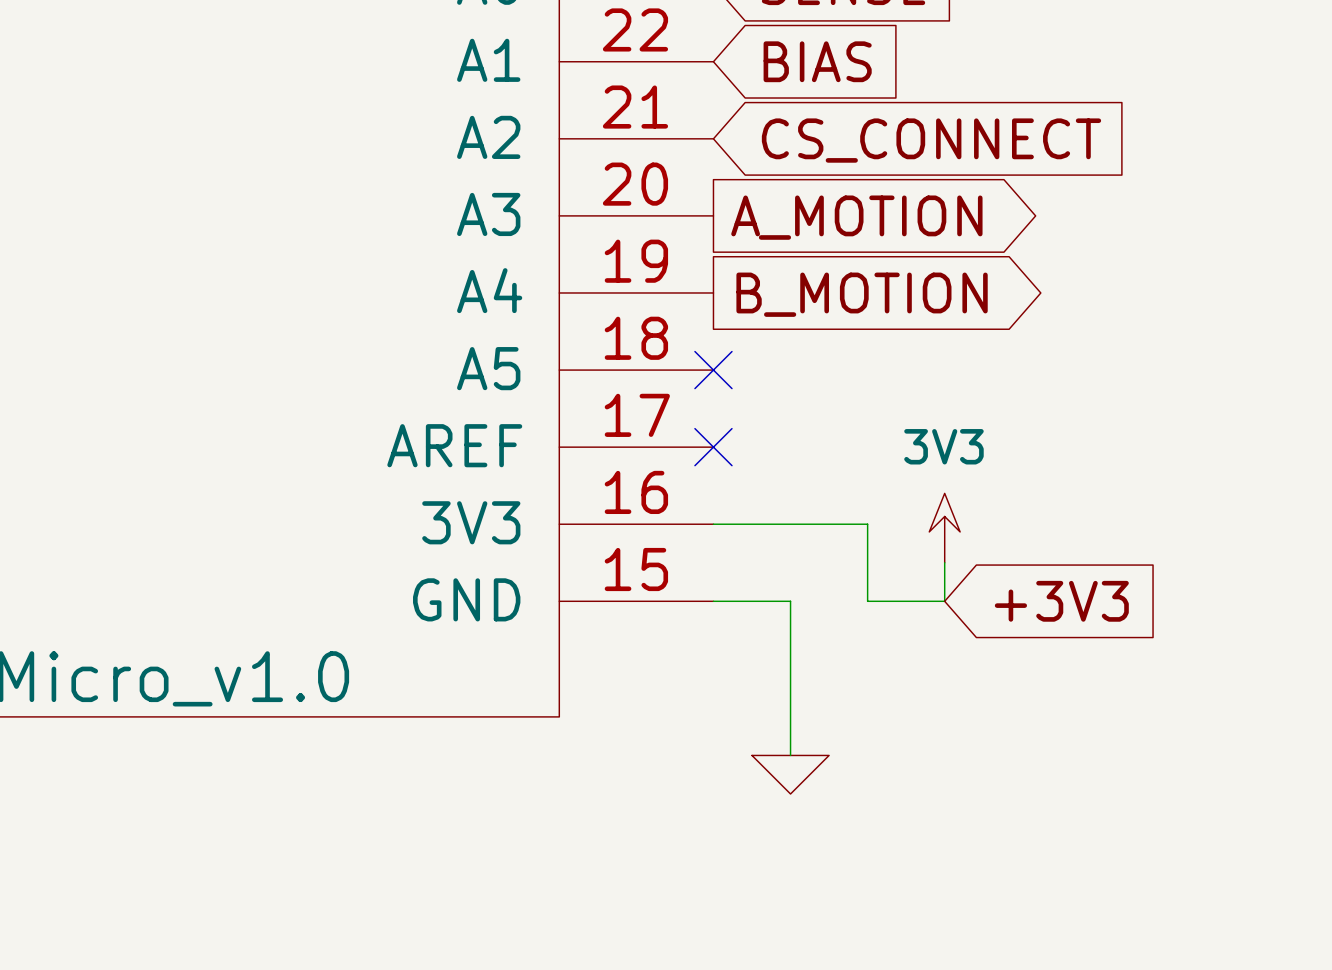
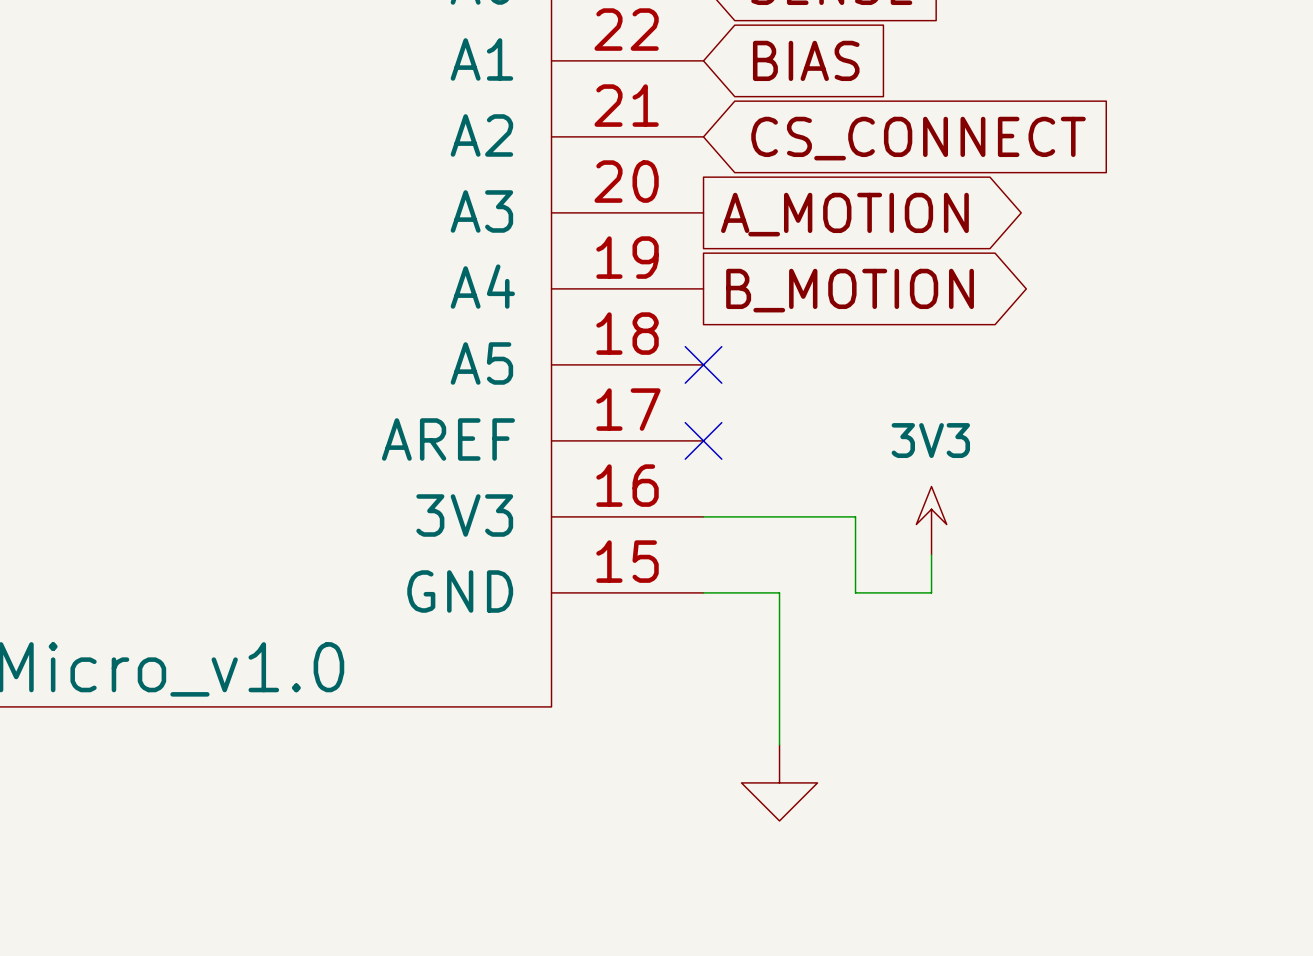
global label: +3V3 (1061, 601) -> none
power symbol shape: [752, 755, 830, 794] -> [741, 744, 818, 821]

